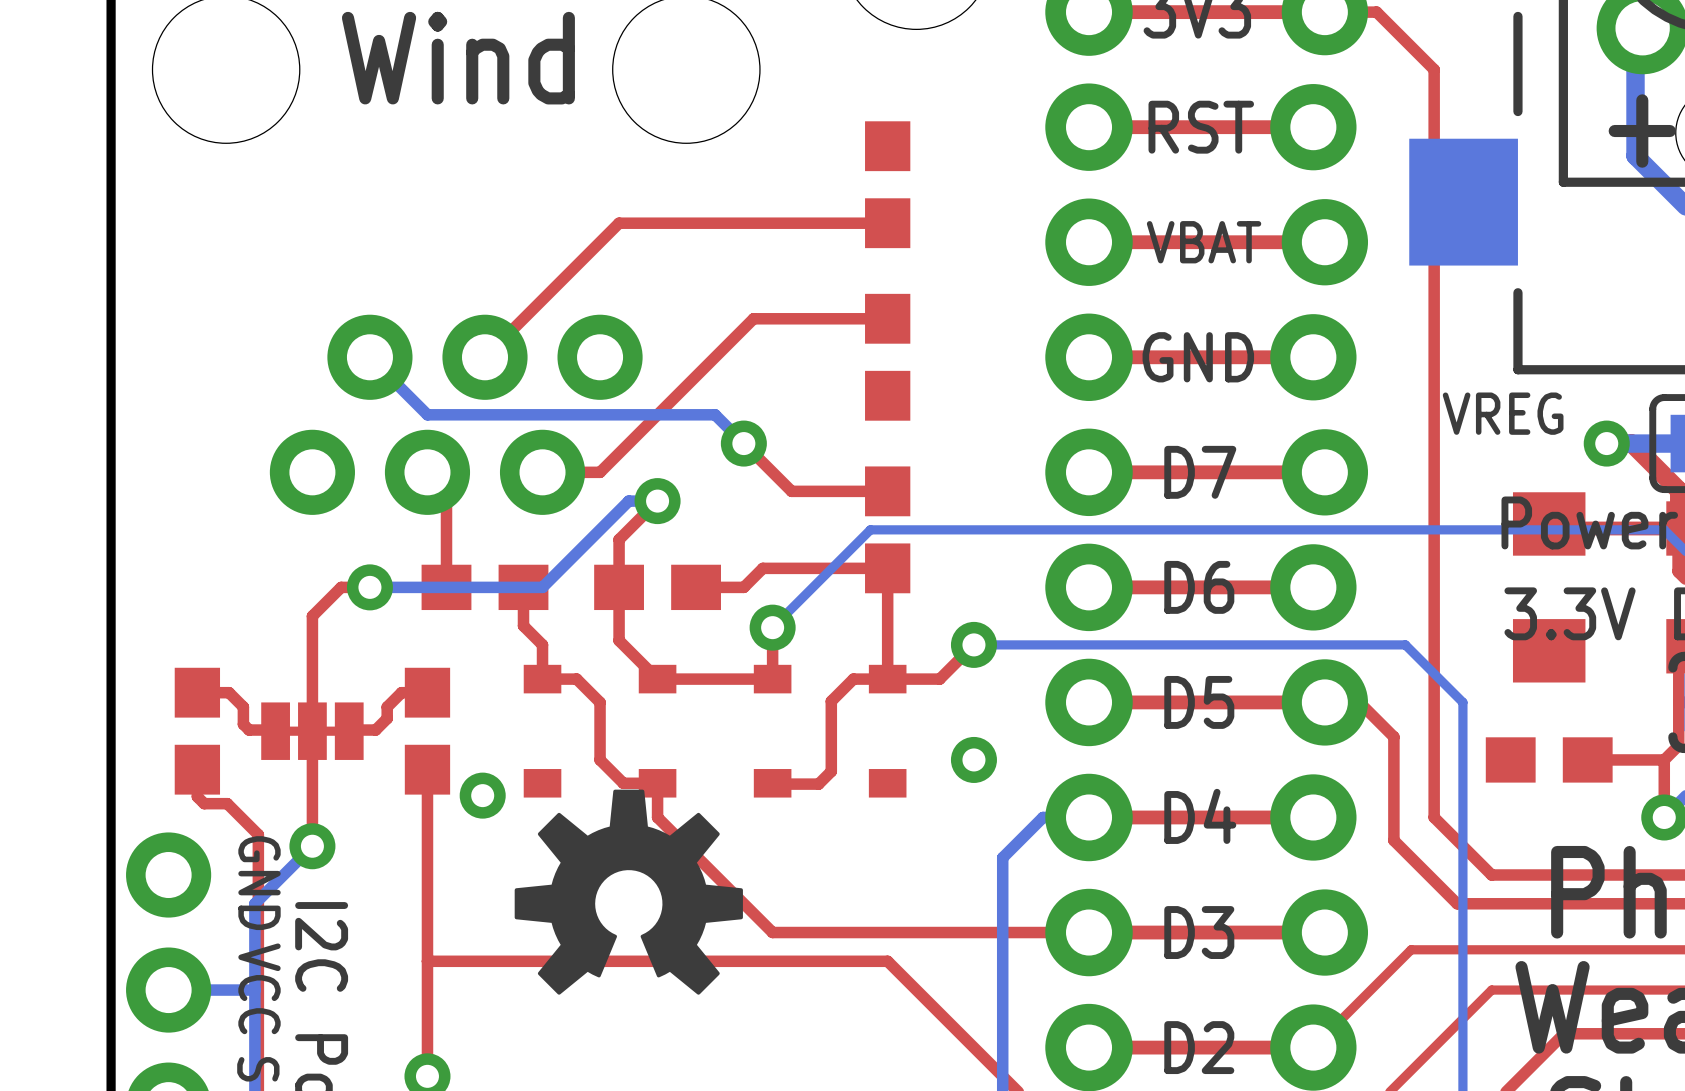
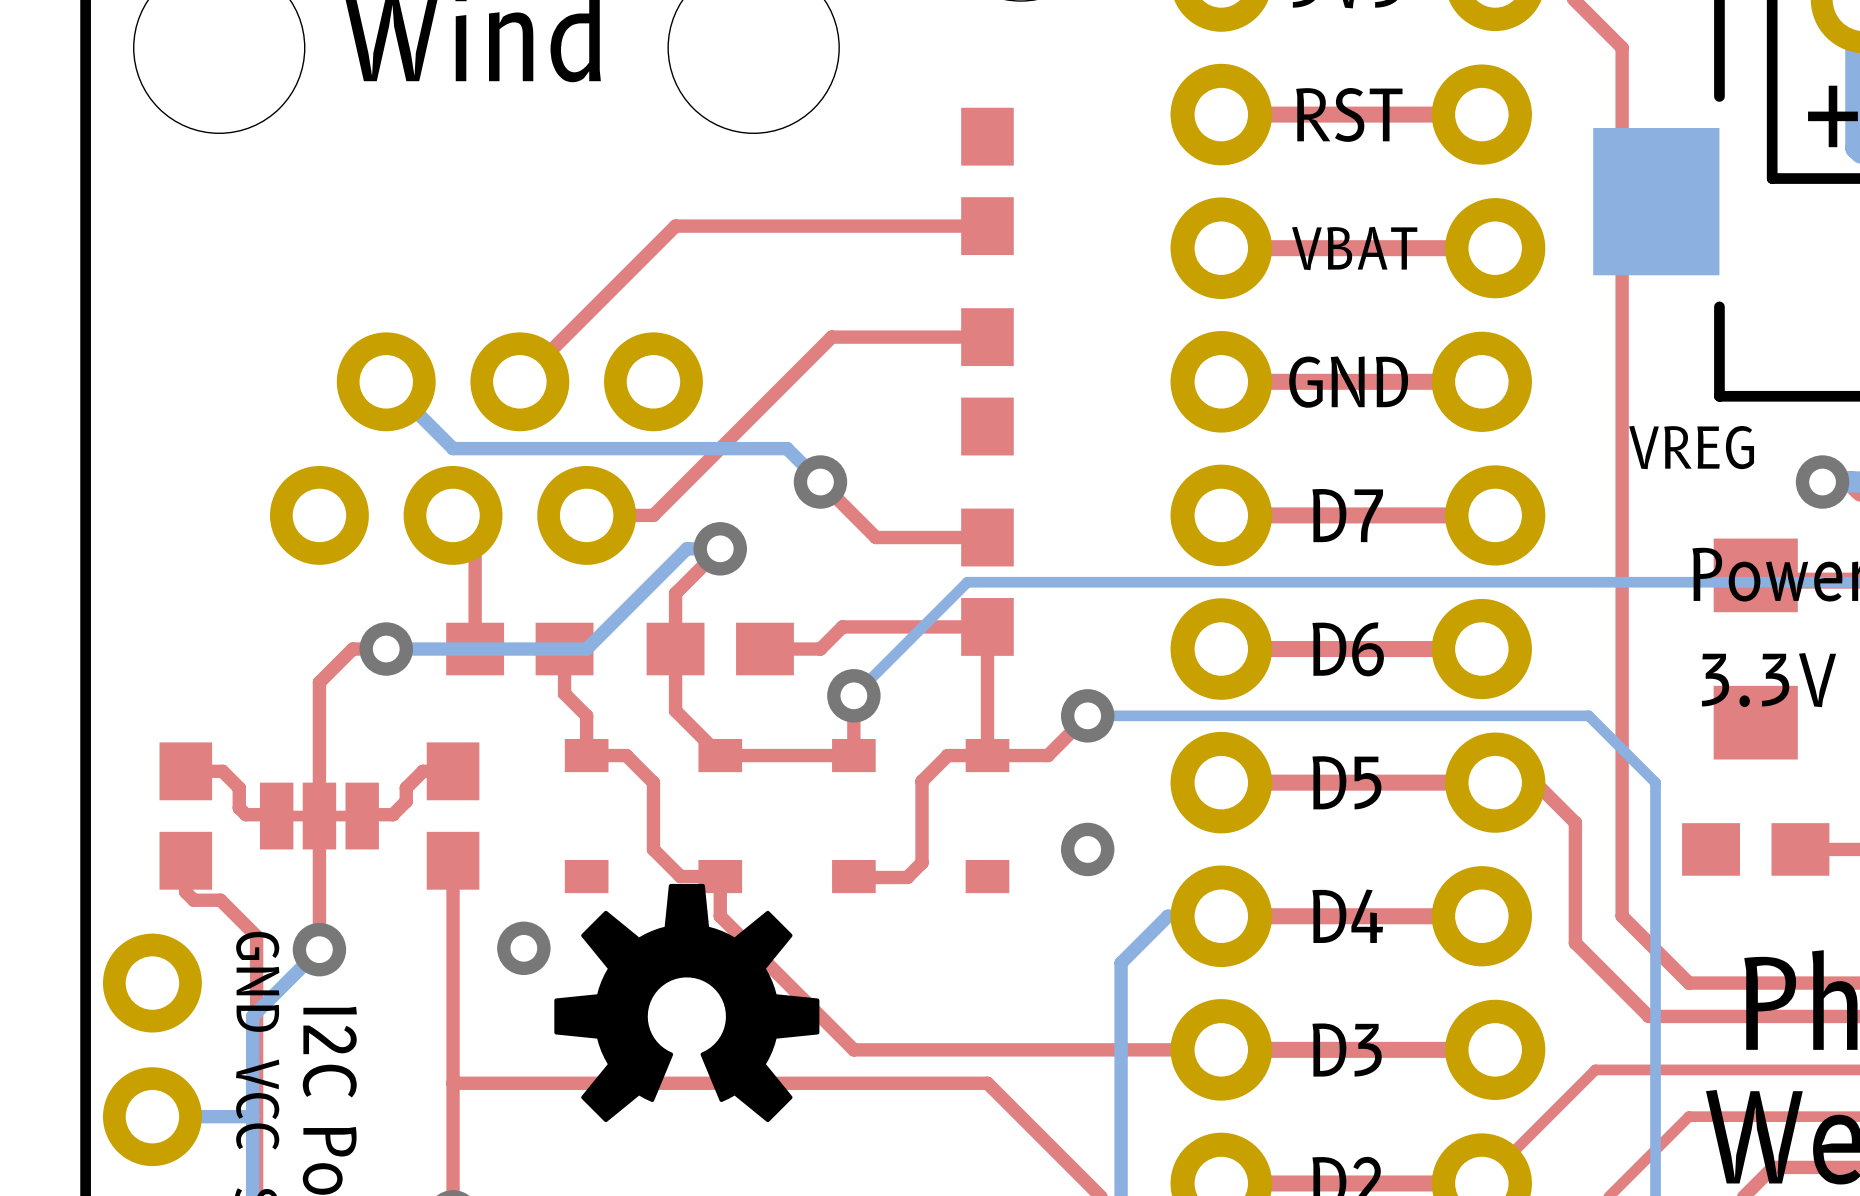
via position: (482, 795) -> (523, 948)

